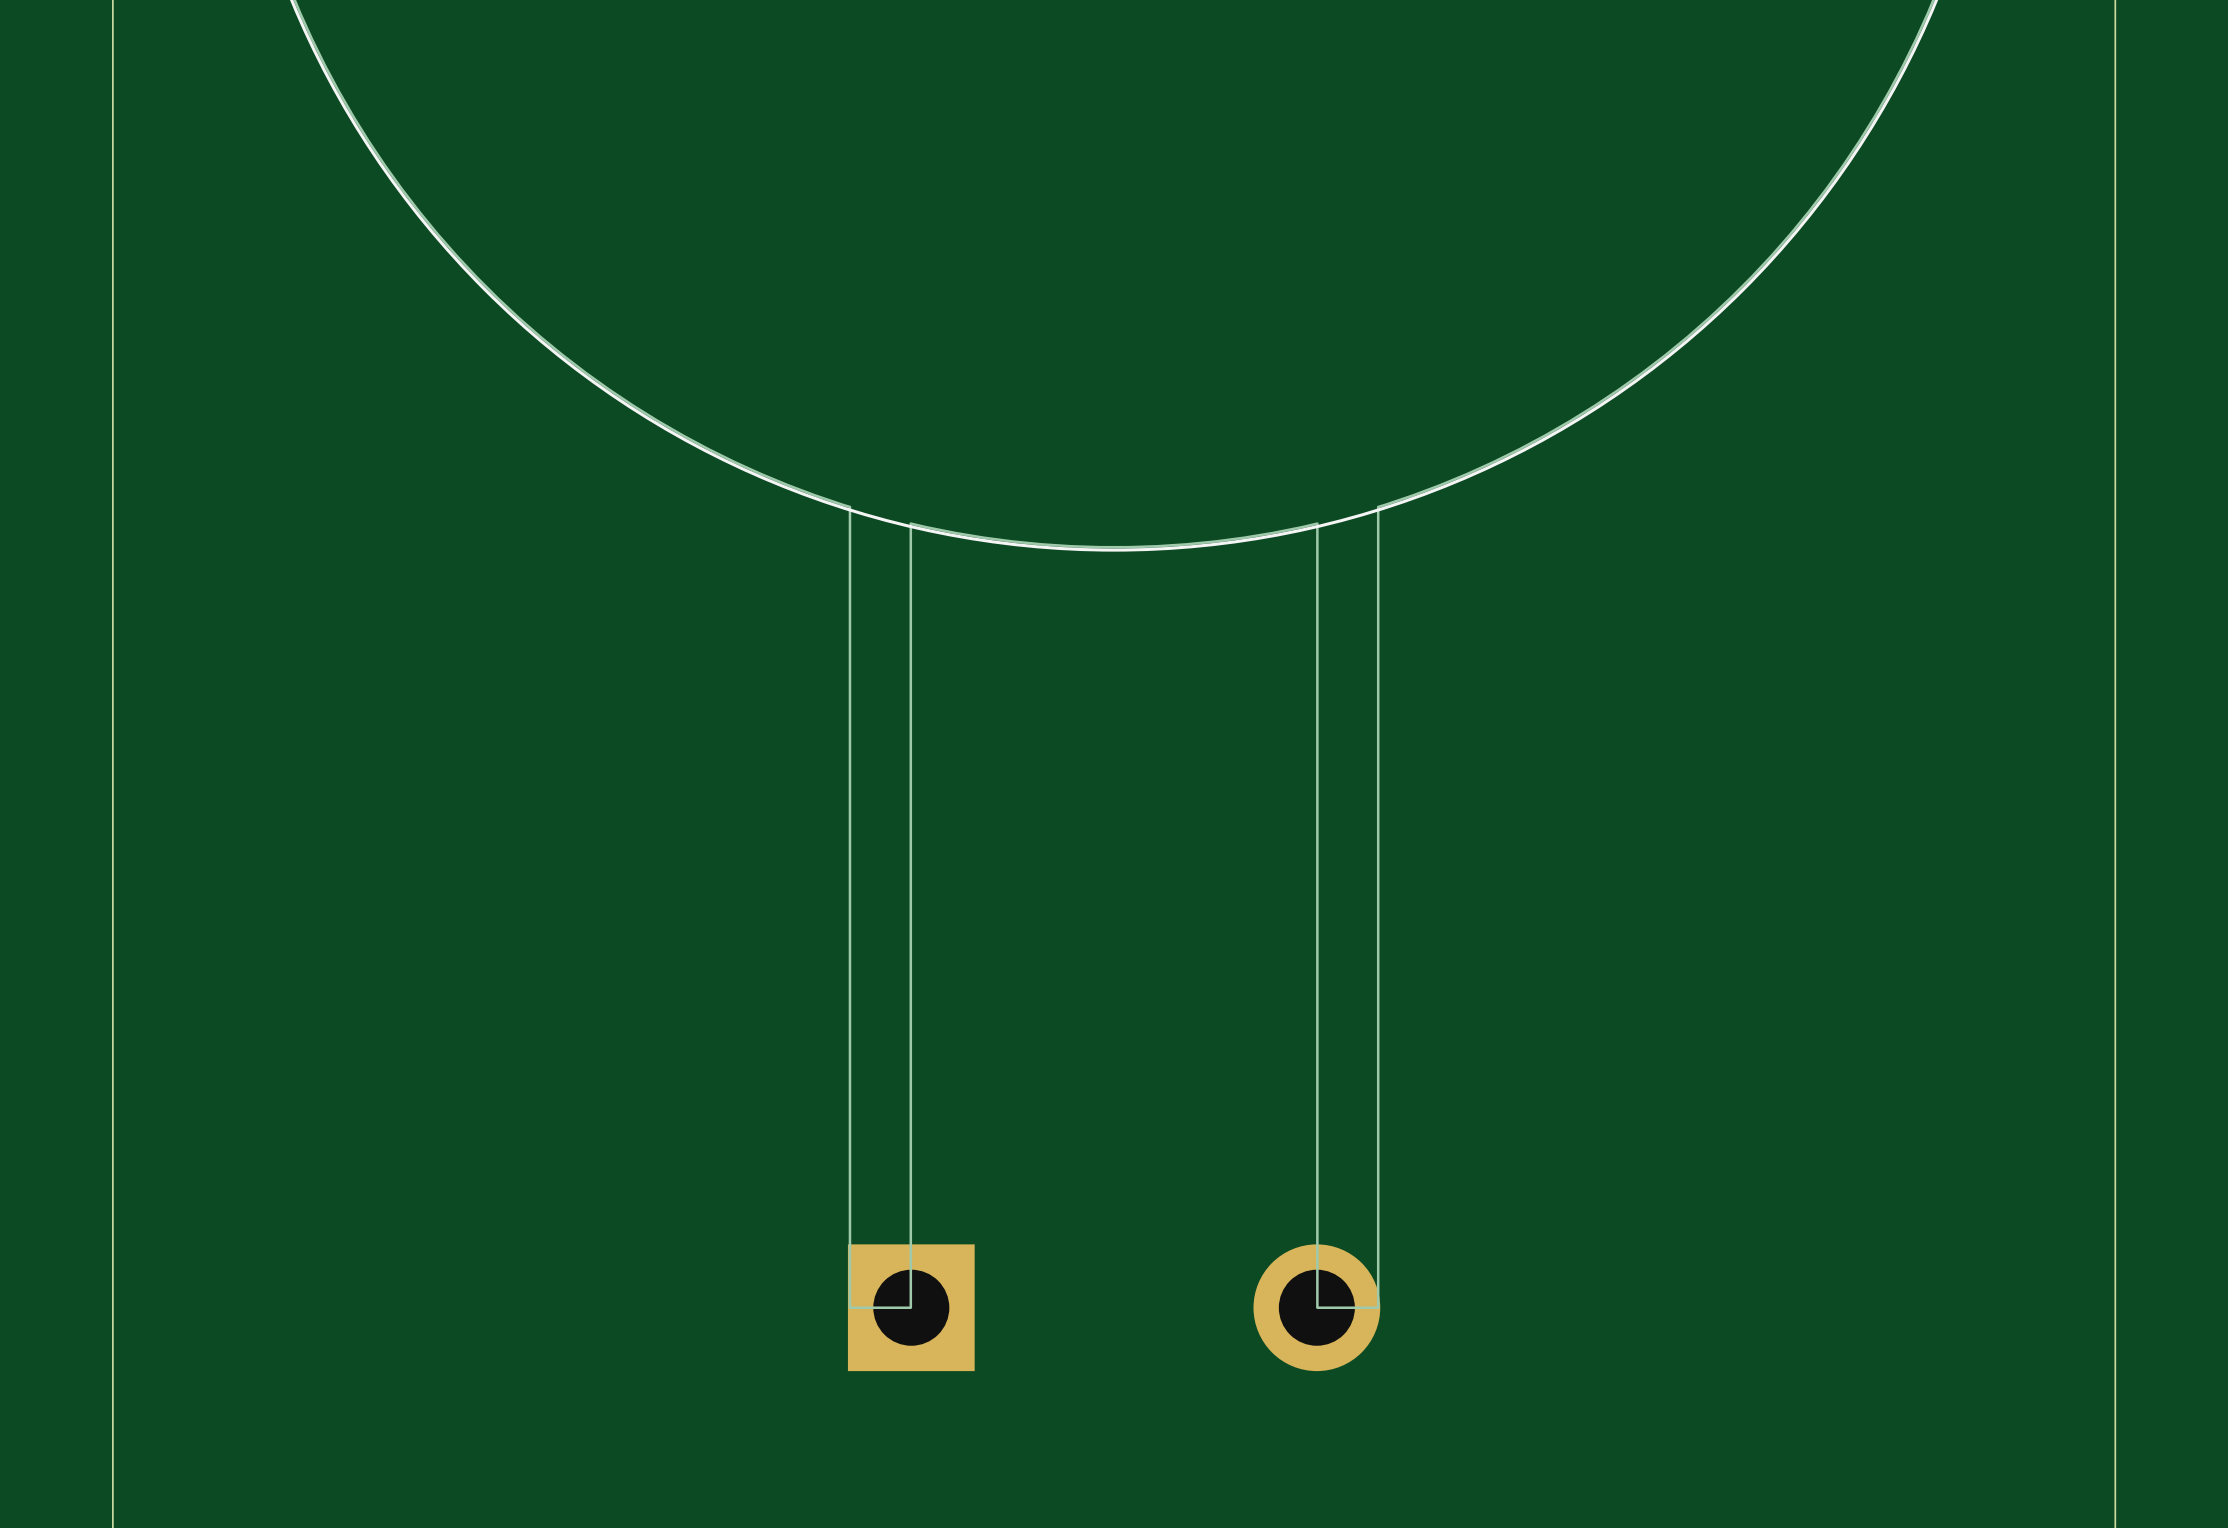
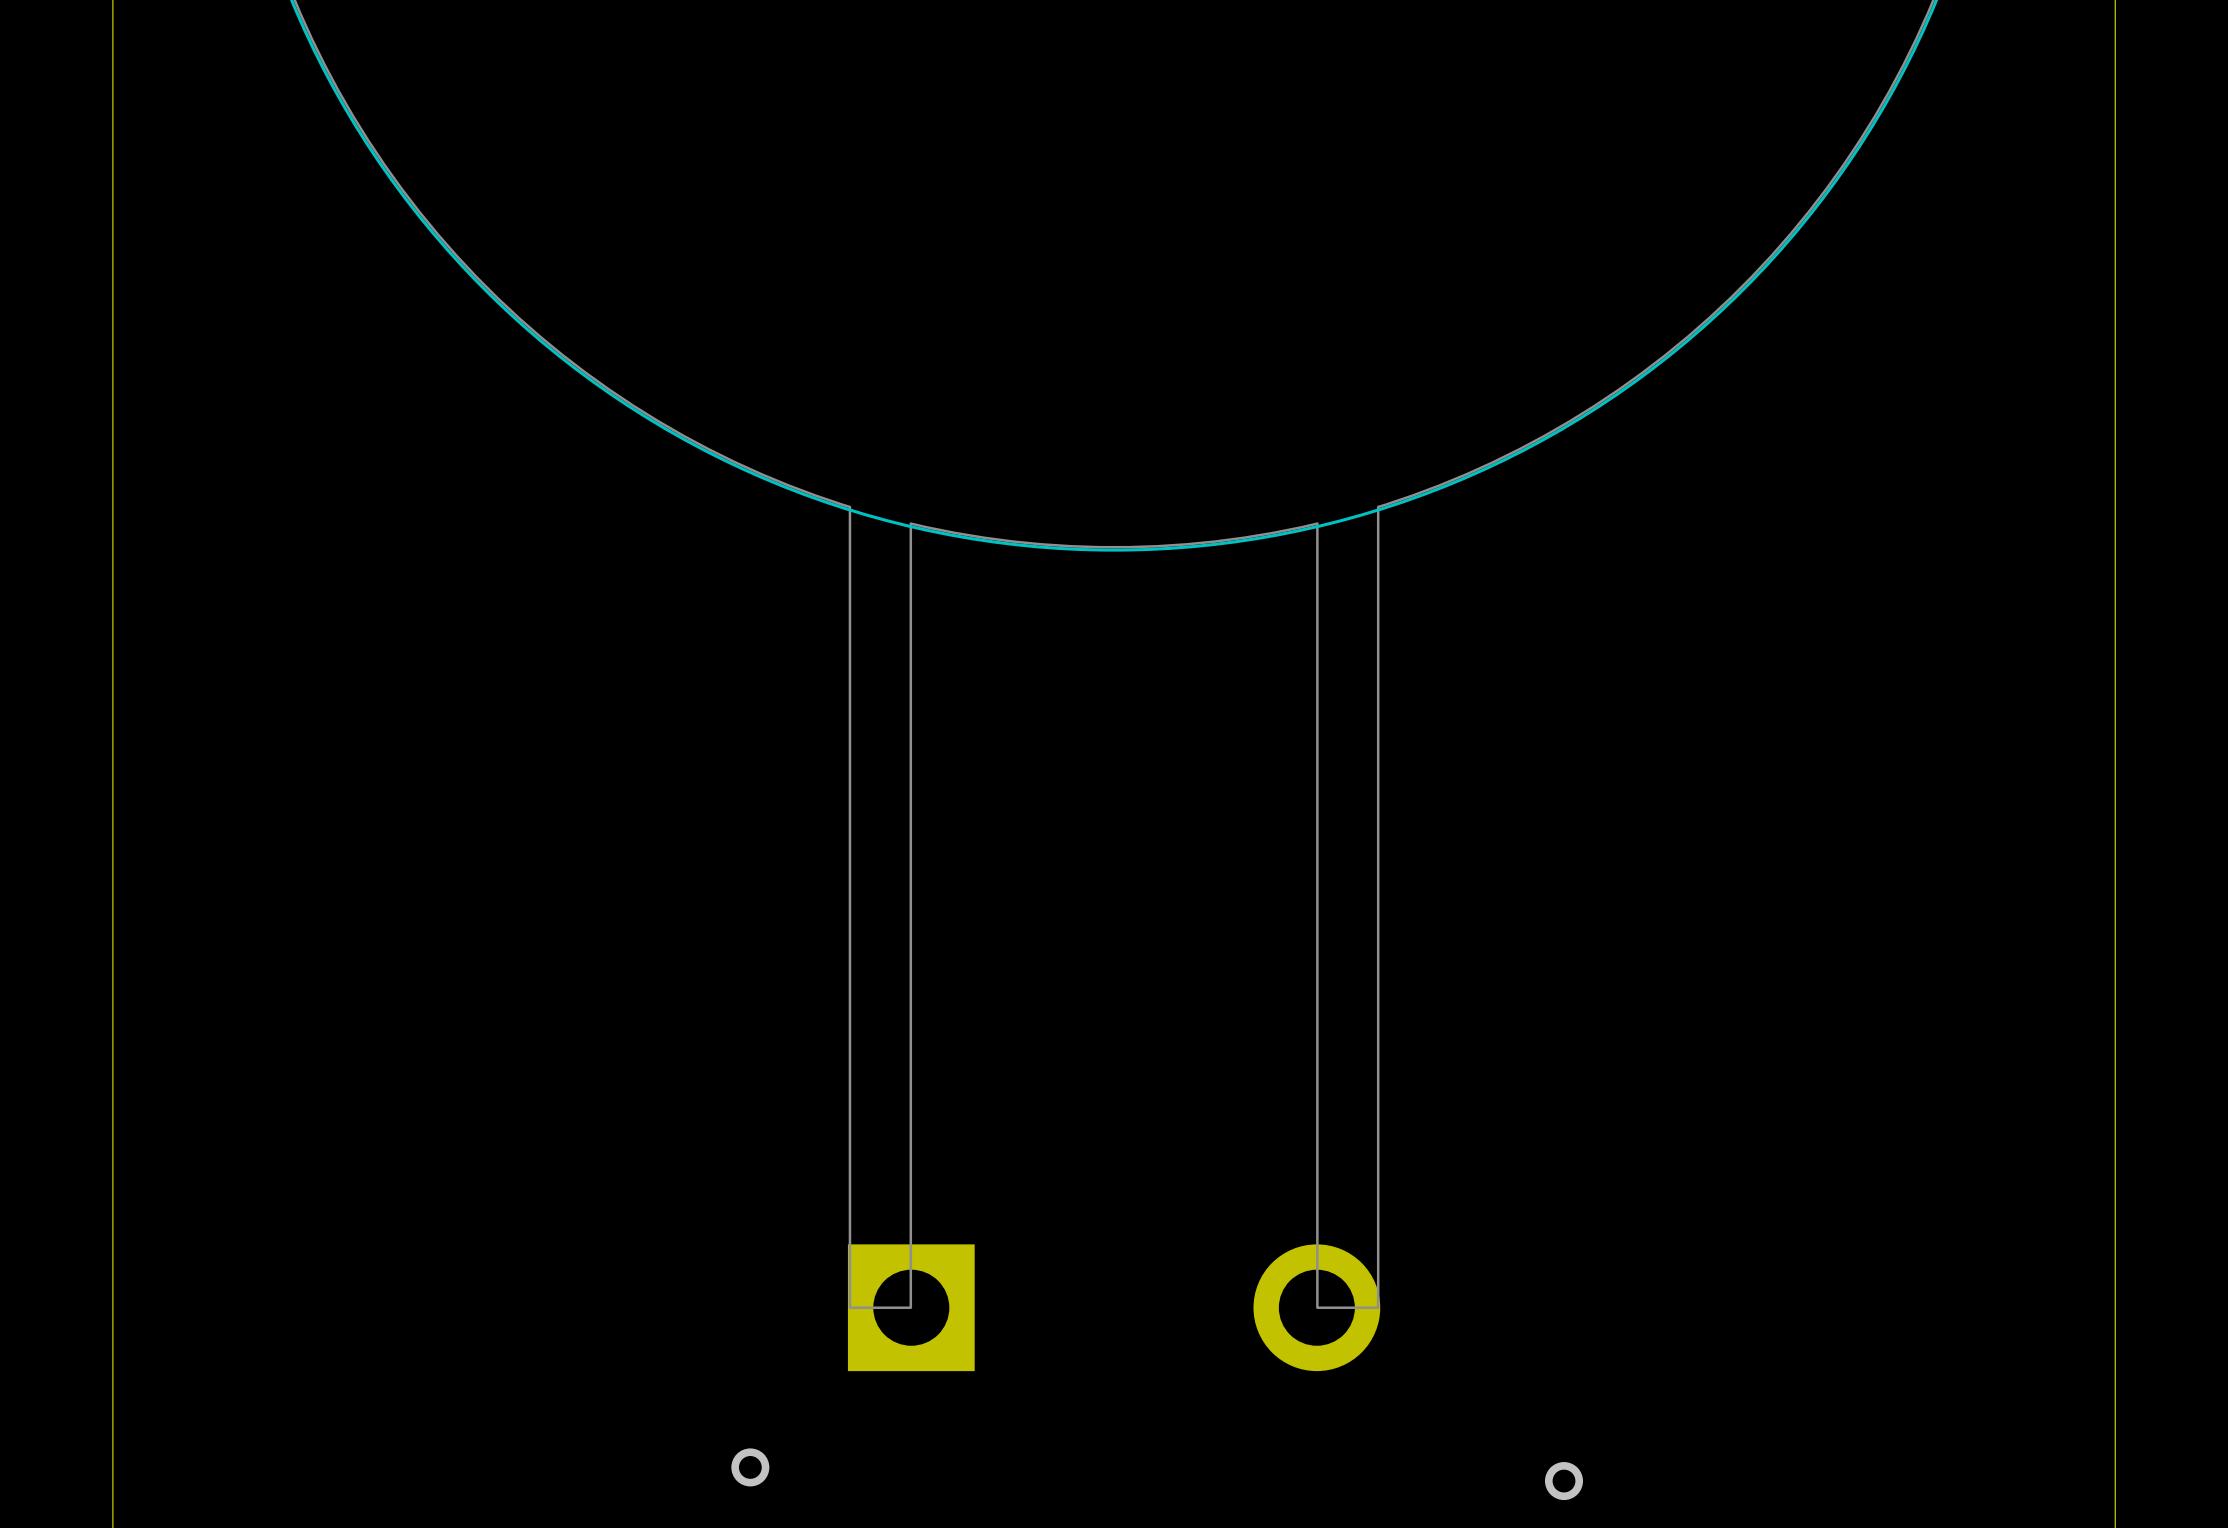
via: none -> (750, 1467)
via: none -> (1563, 1481)

